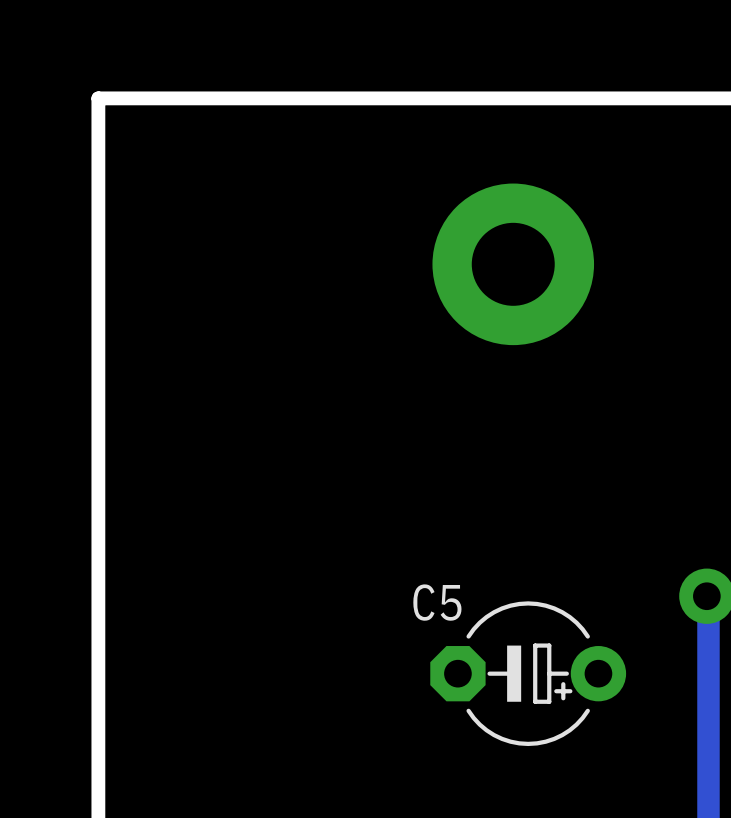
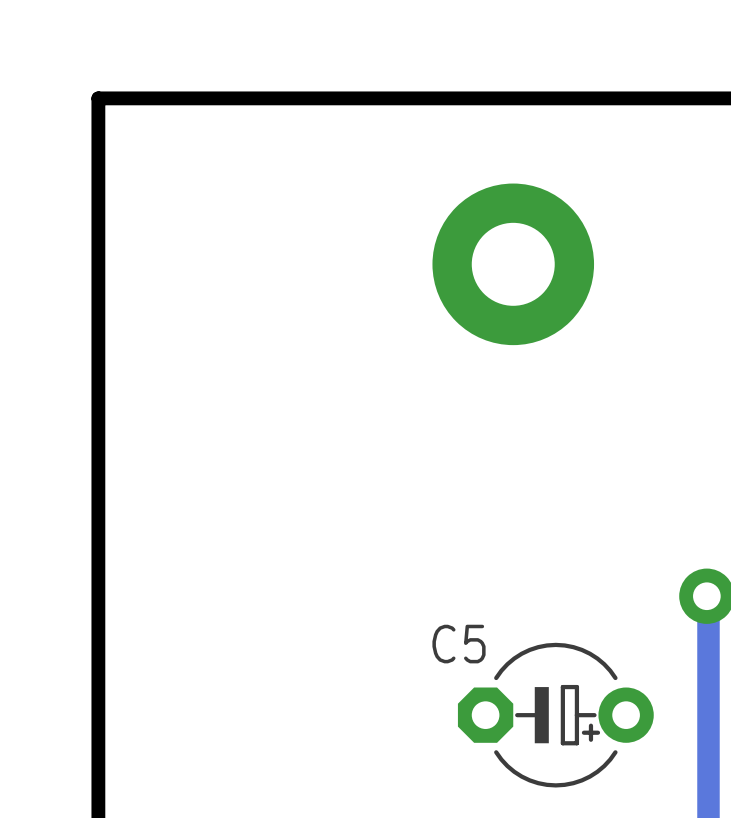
C5 position: (528, 673) -> (555, 715)

